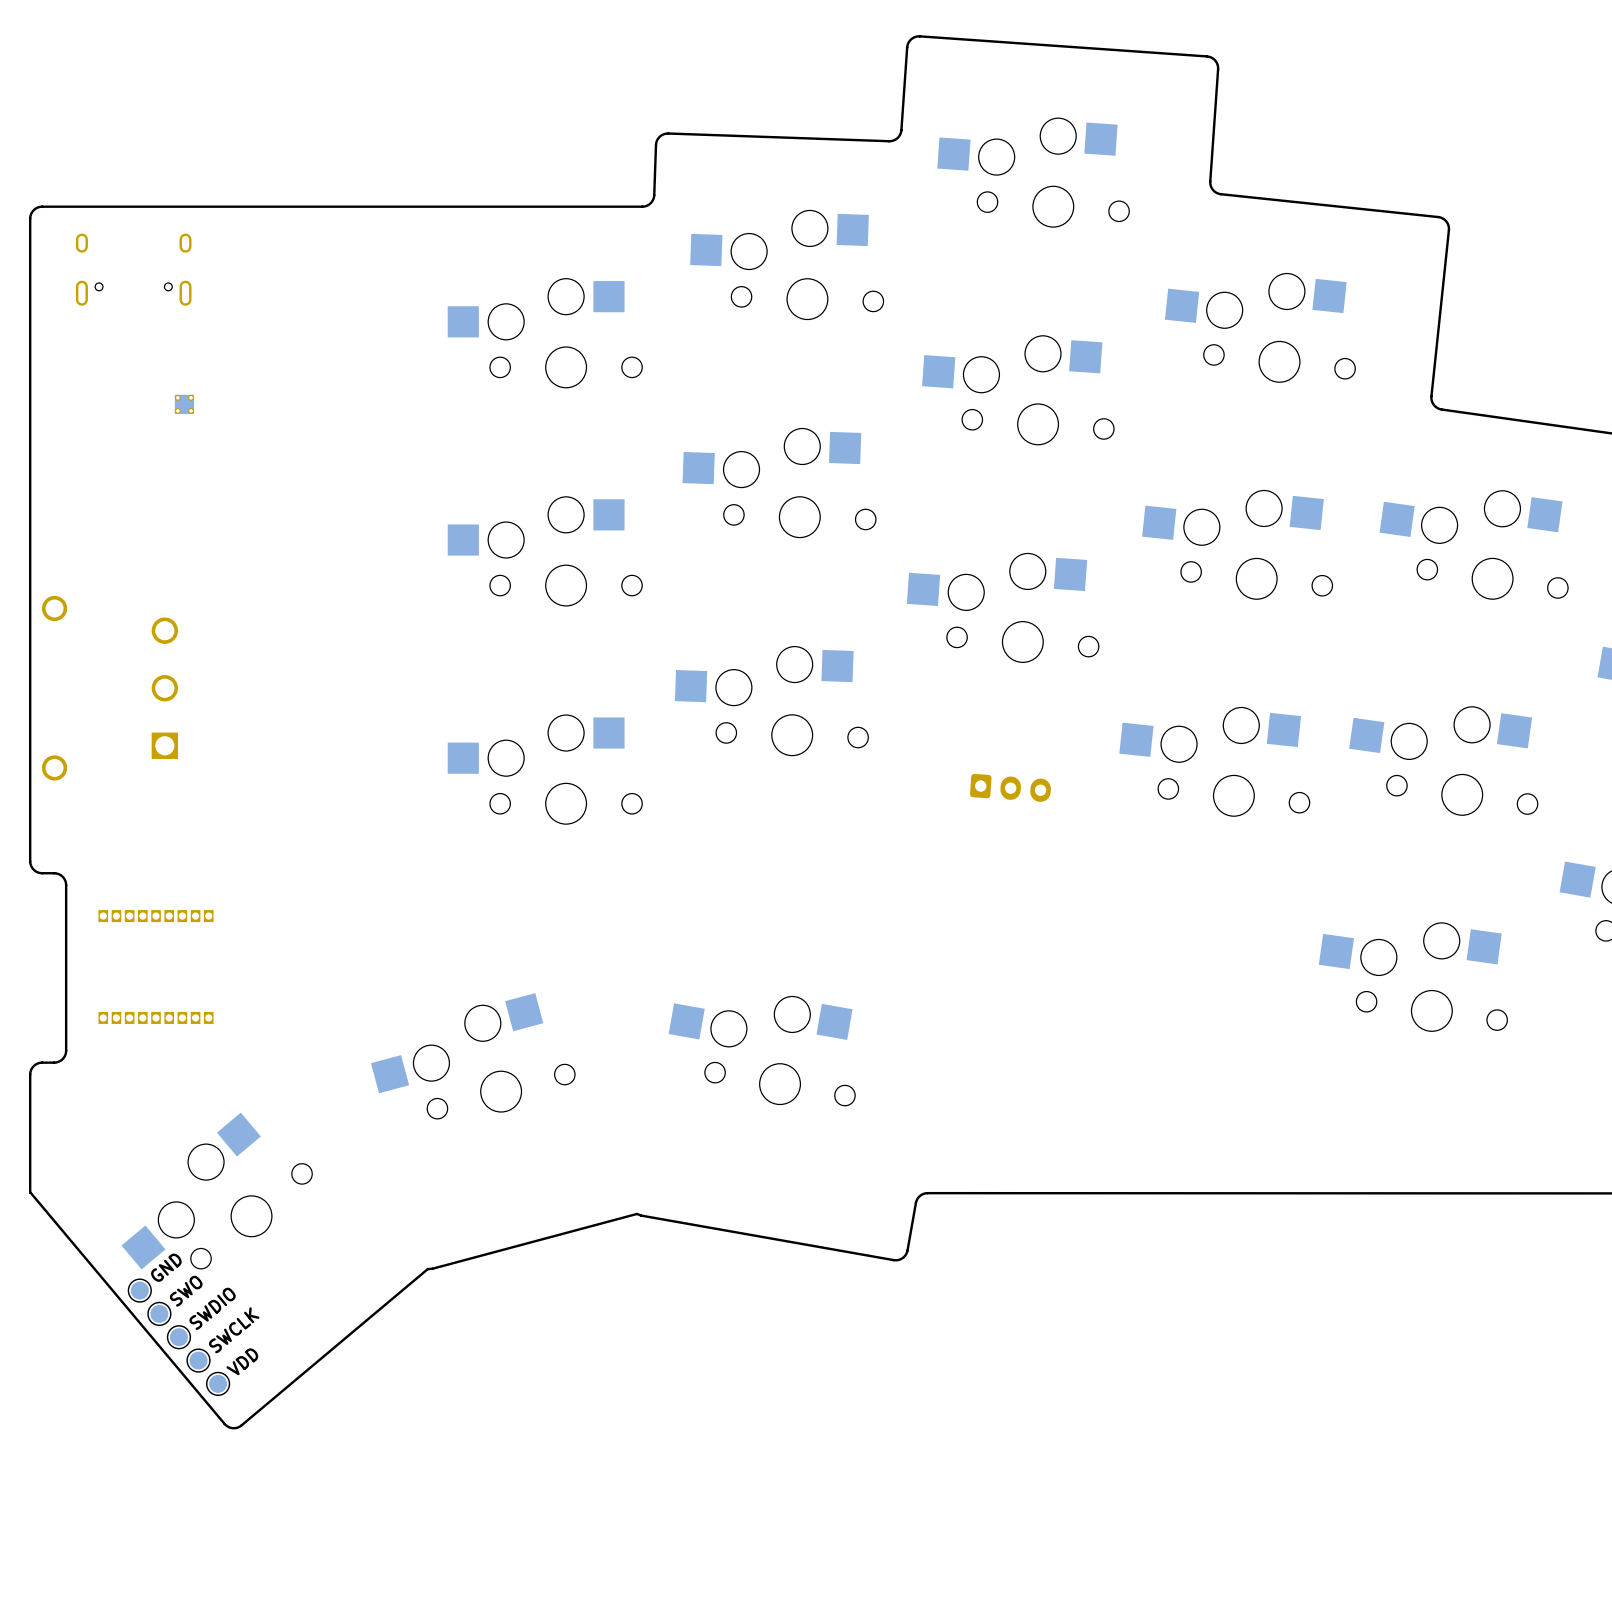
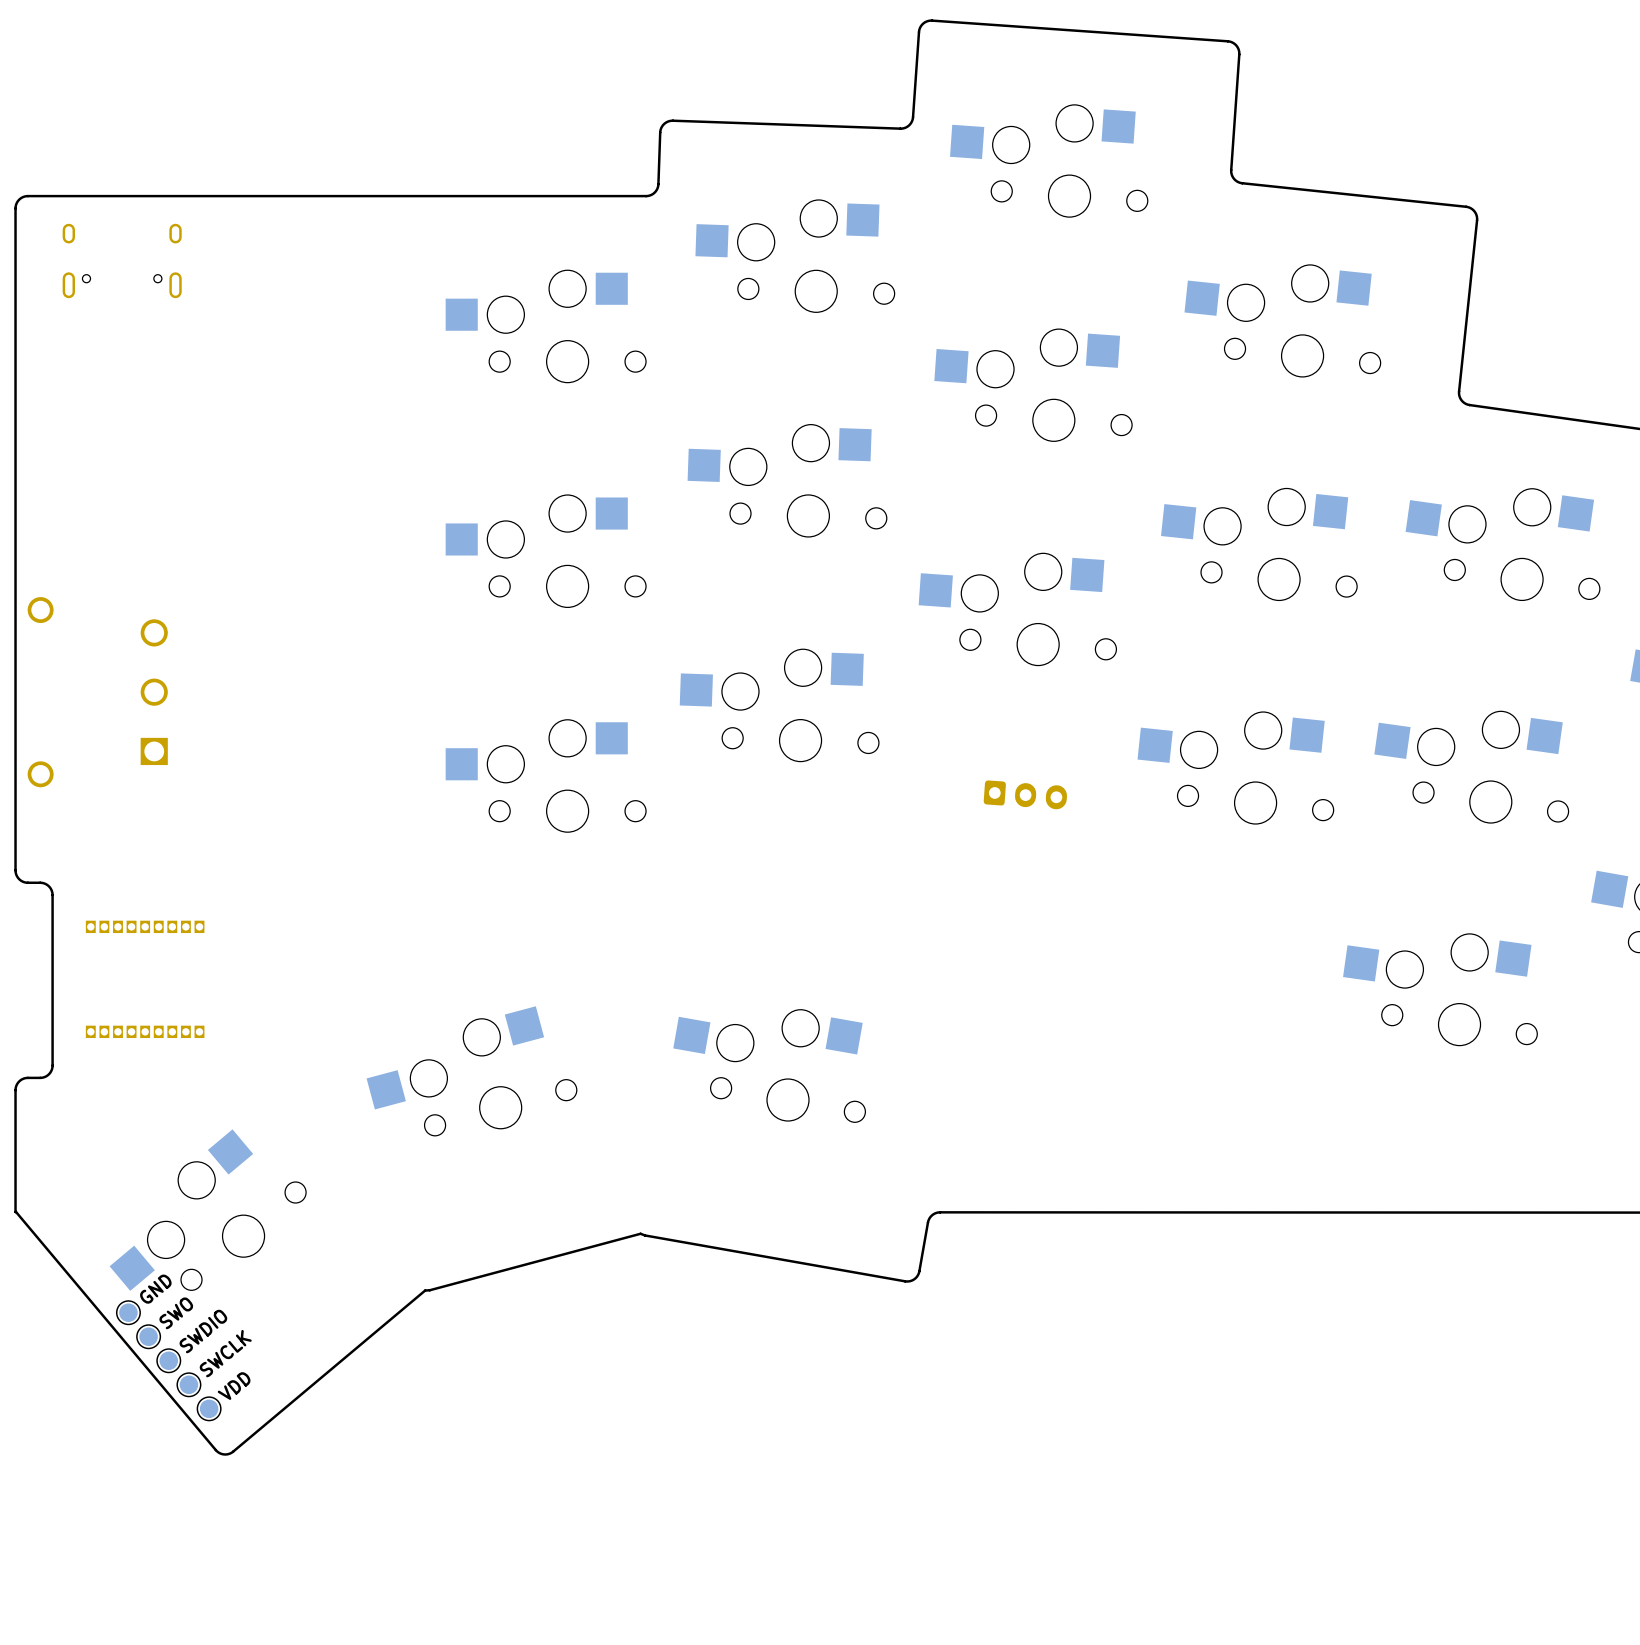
part: (184, 404) -> none

